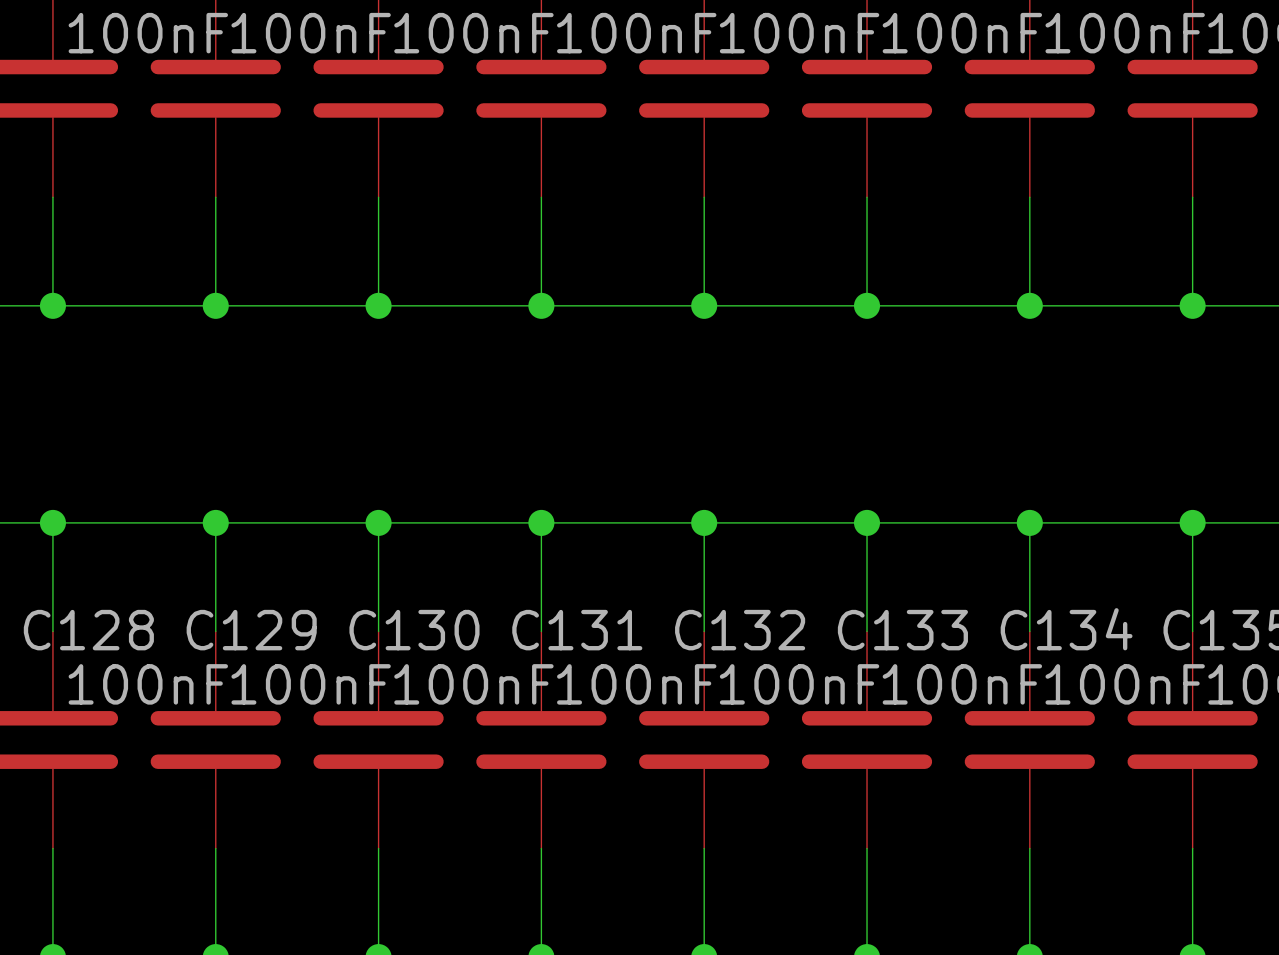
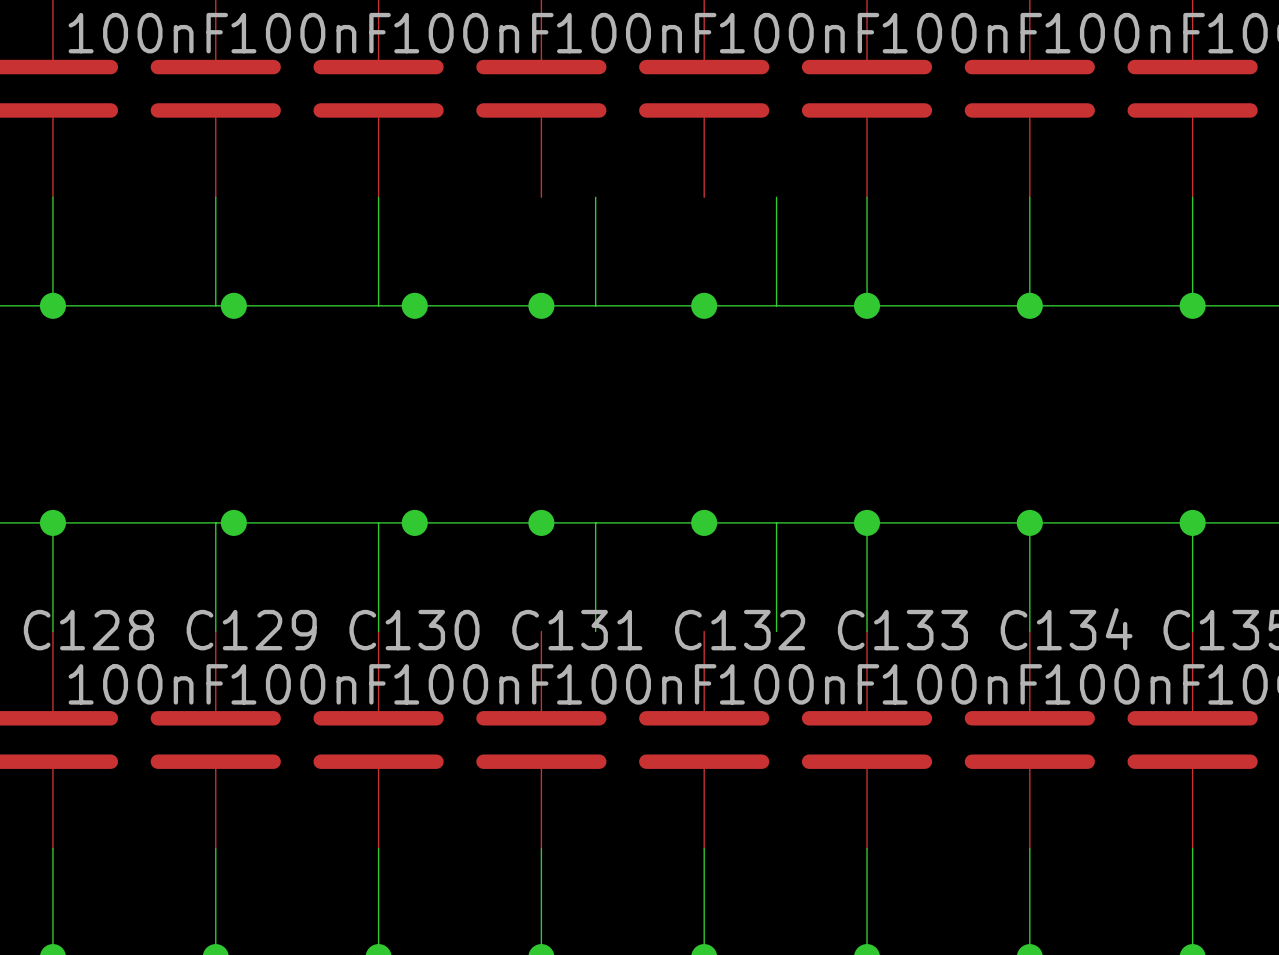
wire: (541, 197) (541, 305) -> (595, 197) (595, 305)
wire: (704, 197) (704, 305) -> (776, 197) (776, 305)
junction position: (215, 305) -> (233, 305)
junction position: (378, 305) -> (414, 305)
junction position: (215, 522) -> (233, 522)
junction position: (378, 522) -> (414, 522)
wire: (541, 522) (541, 631) -> (595, 522) (595, 631)
wire: (704, 522) (704, 631) -> (776, 522) (776, 631)

